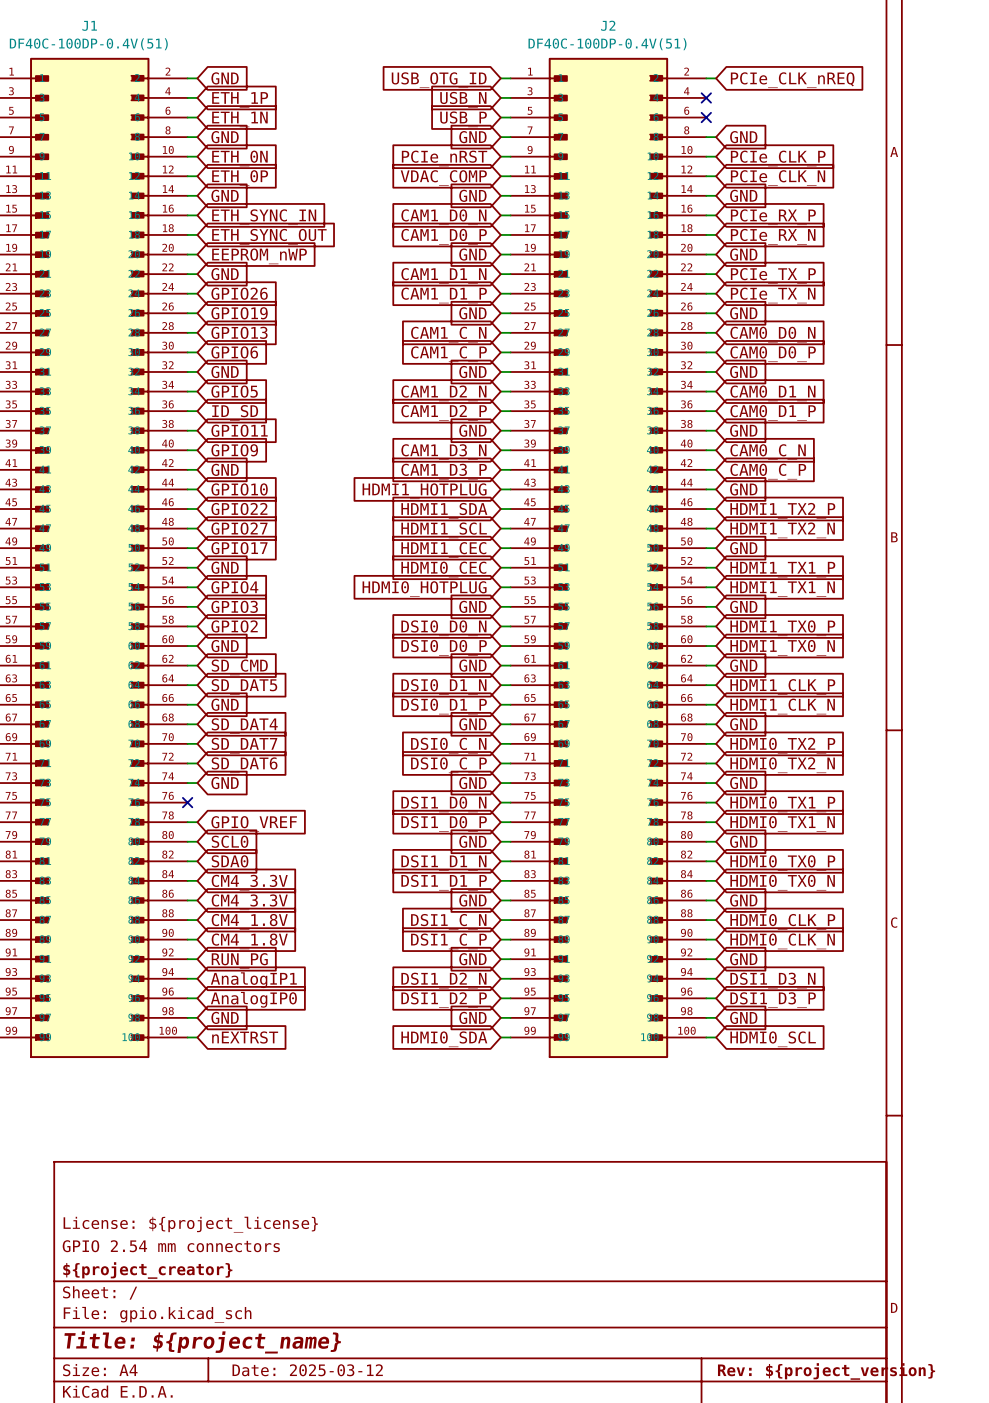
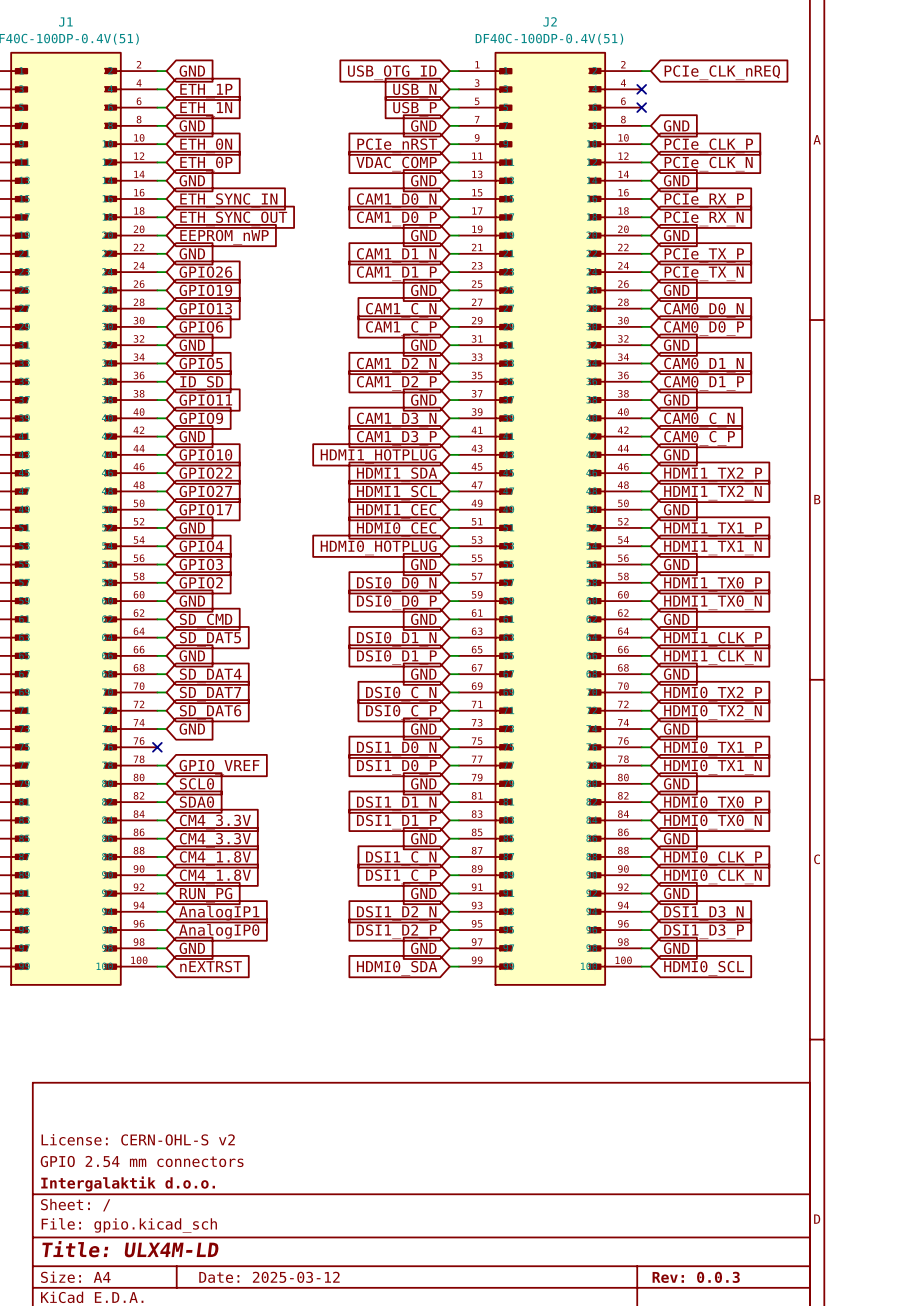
title block: License: ${project_license} (190, 1224) -> License: CERN-OHL-S v2 (138, 1139)
title block: ${project_creator} (147, 1270) -> Intergalaktik d.o.o. (128, 1183)
title block: Title: ${project_name} (202, 1342) -> Title: ULX4M-LD (130, 1249)
title block: Rev: ${project_version} (826, 1371) -> Rev: 0.0.3 (696, 1277)

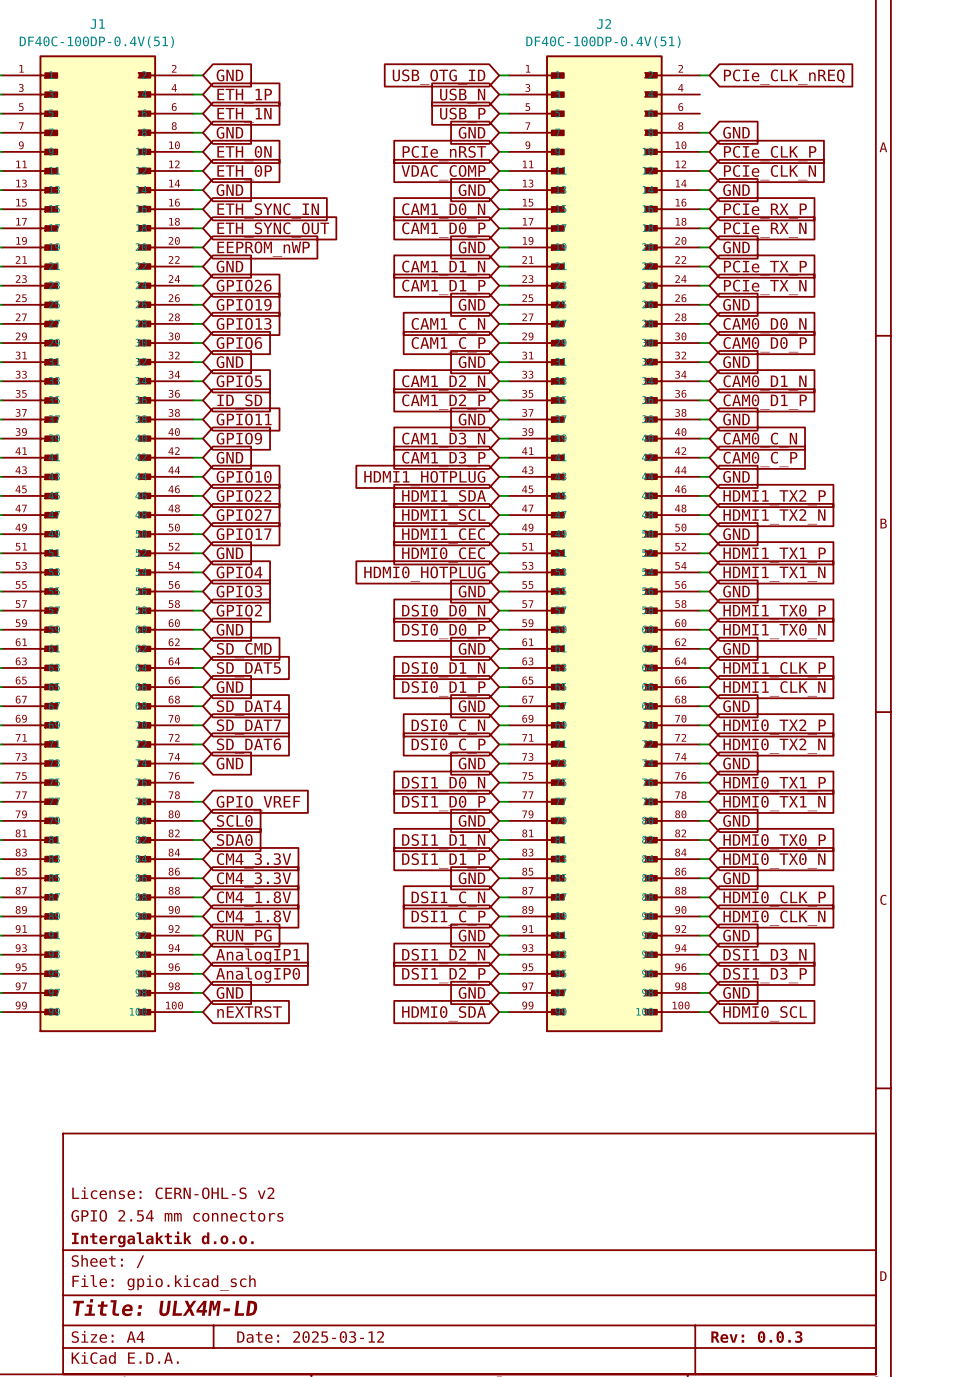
no-connect mark: (641, 89) -> none
no-connect mark: (641, 107) -> none
no-connect mark: (157, 747) -> none

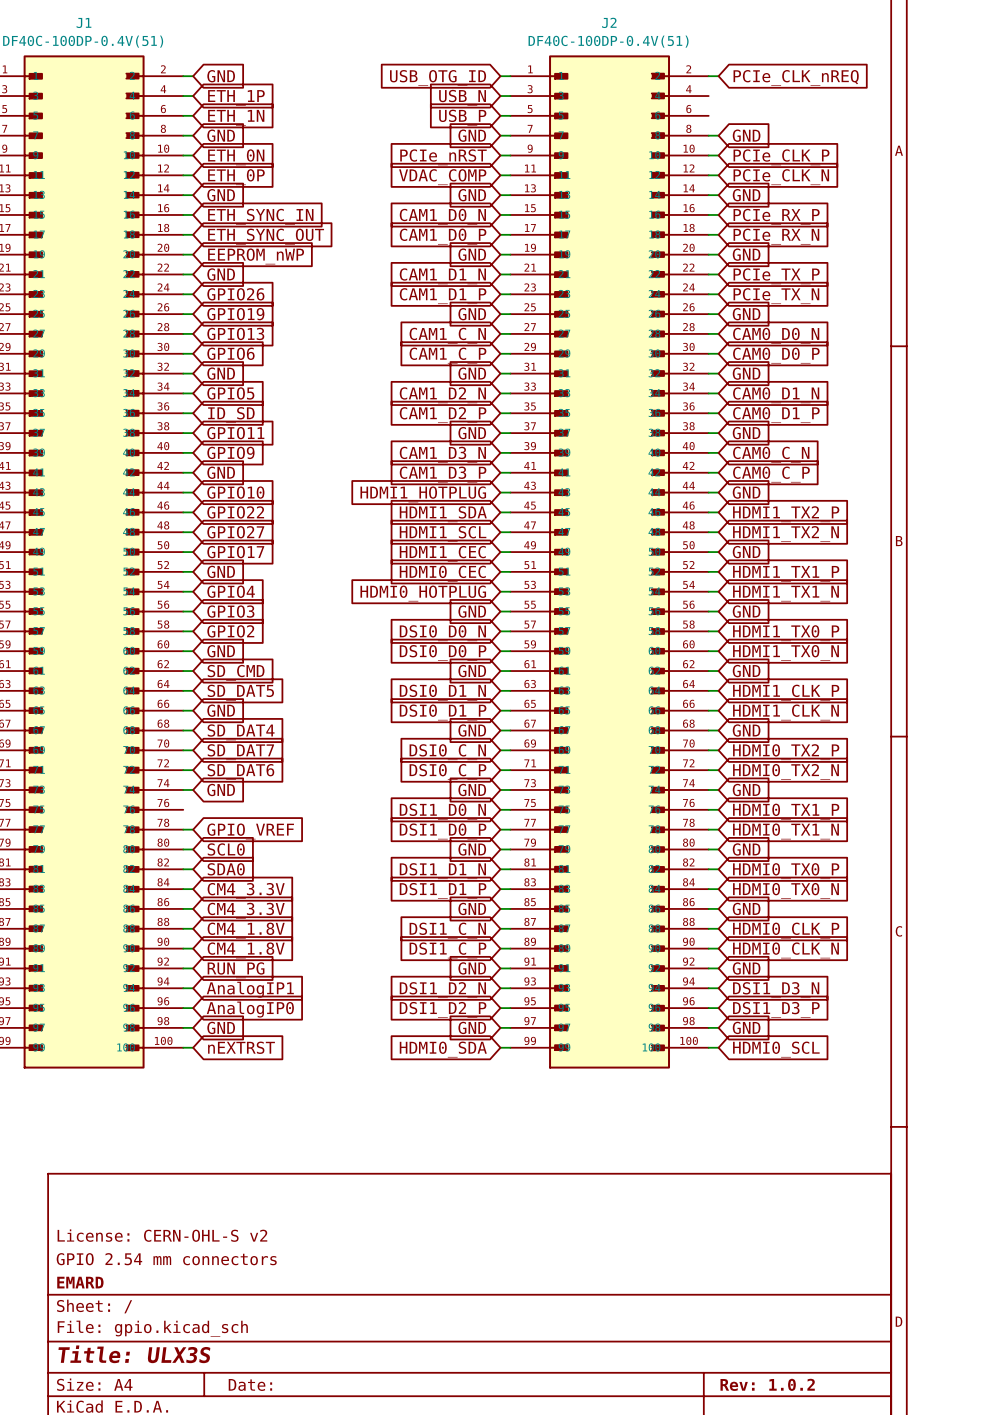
title block: Intergalaktik d.o.o. (162, 1239) -> EMARD (80, 1282)
title block: Title: ULX4M-LD (165, 1307) -> Title: ULX3S (134, 1354)
title block: Date: 2025-03-12 (310, 1337) -> Date: (250, 1384)
title block: Rev: 0.0.3 (756, 1337) -> Rev: 1.0.2 (767, 1384)

